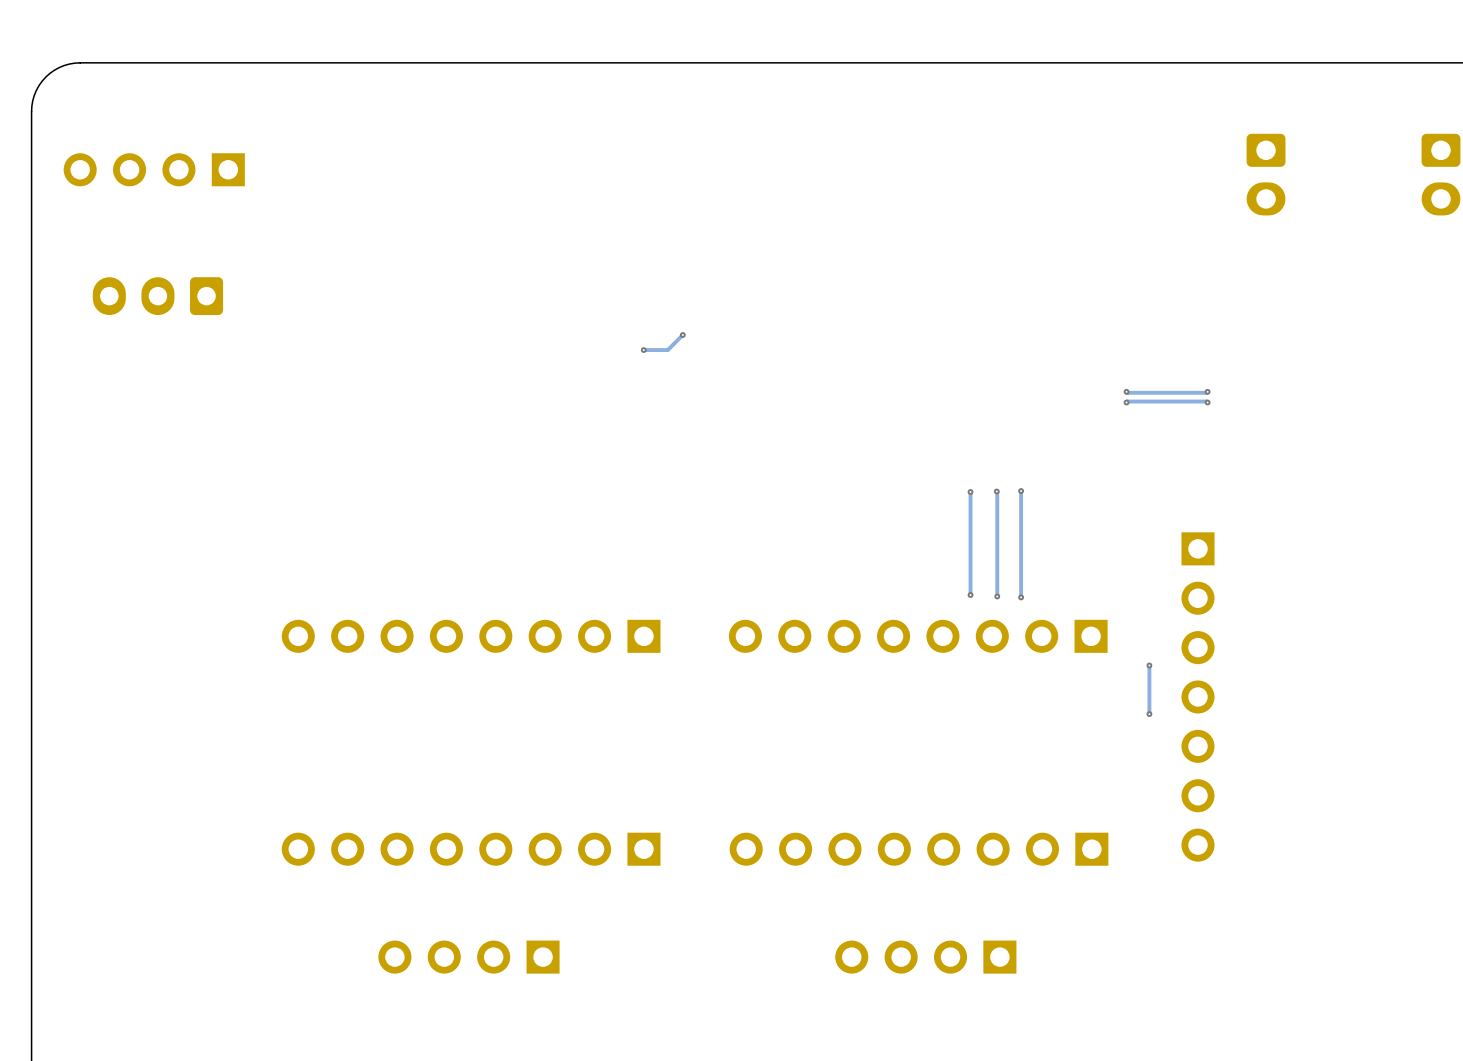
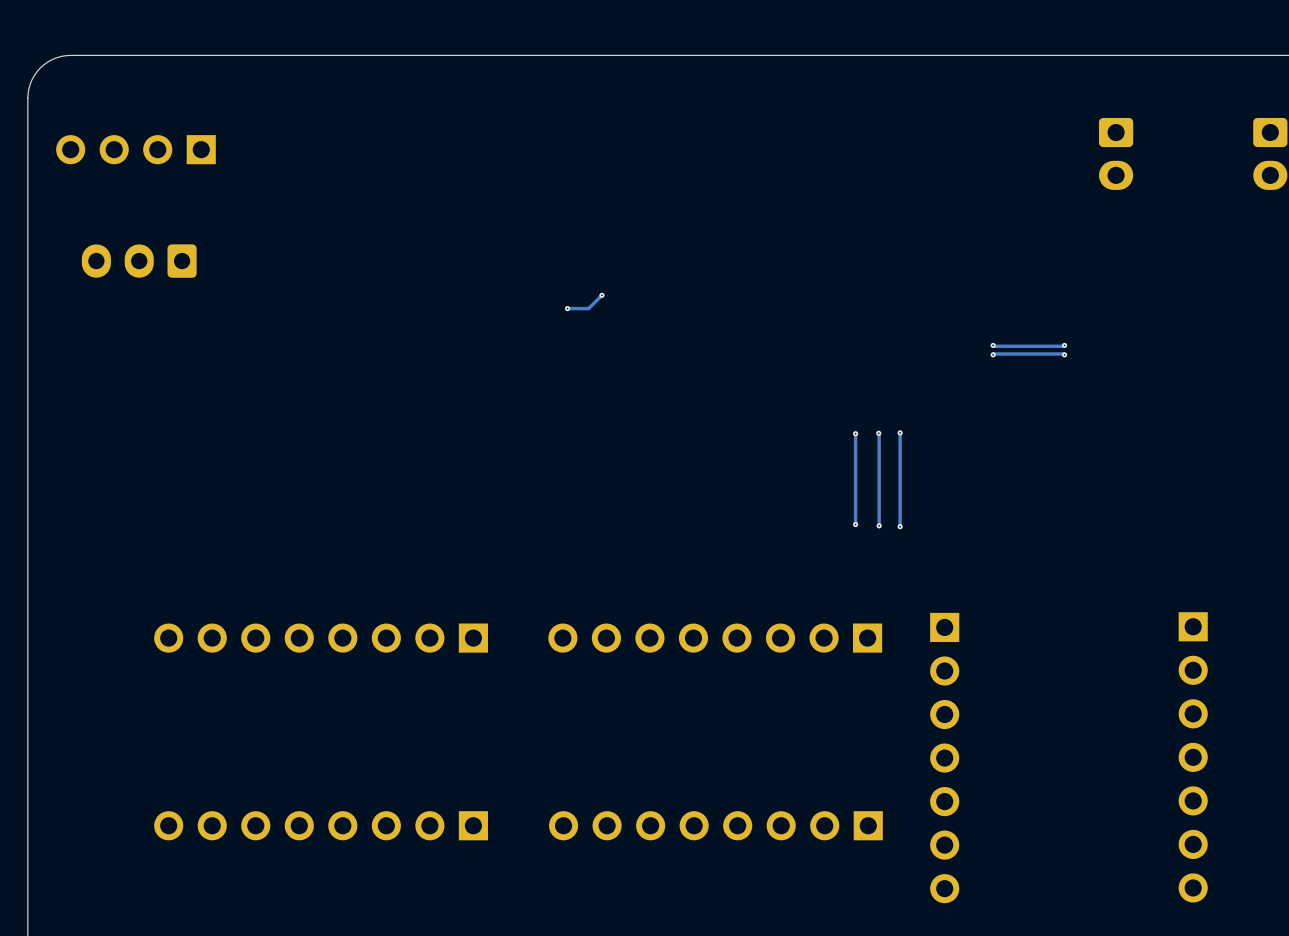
part: (471, 636) -> none
part: (918, 636) -> none
track: (1149, 665) (1149, 714) -> none
via: (1149, 665) -> none
part: (1198, 696) -> none
via: (1149, 714) -> none
part: none -> (321, 638)
part: none -> (715, 638)
part: (471, 849) -> none
part: (919, 849) -> none
part: none -> (944, 758)
part: none -> (1193, 757)
part: none -> (321, 825)
part: none -> (715, 825)
part: (468, 957) -> none
part: (925, 957) -> none

